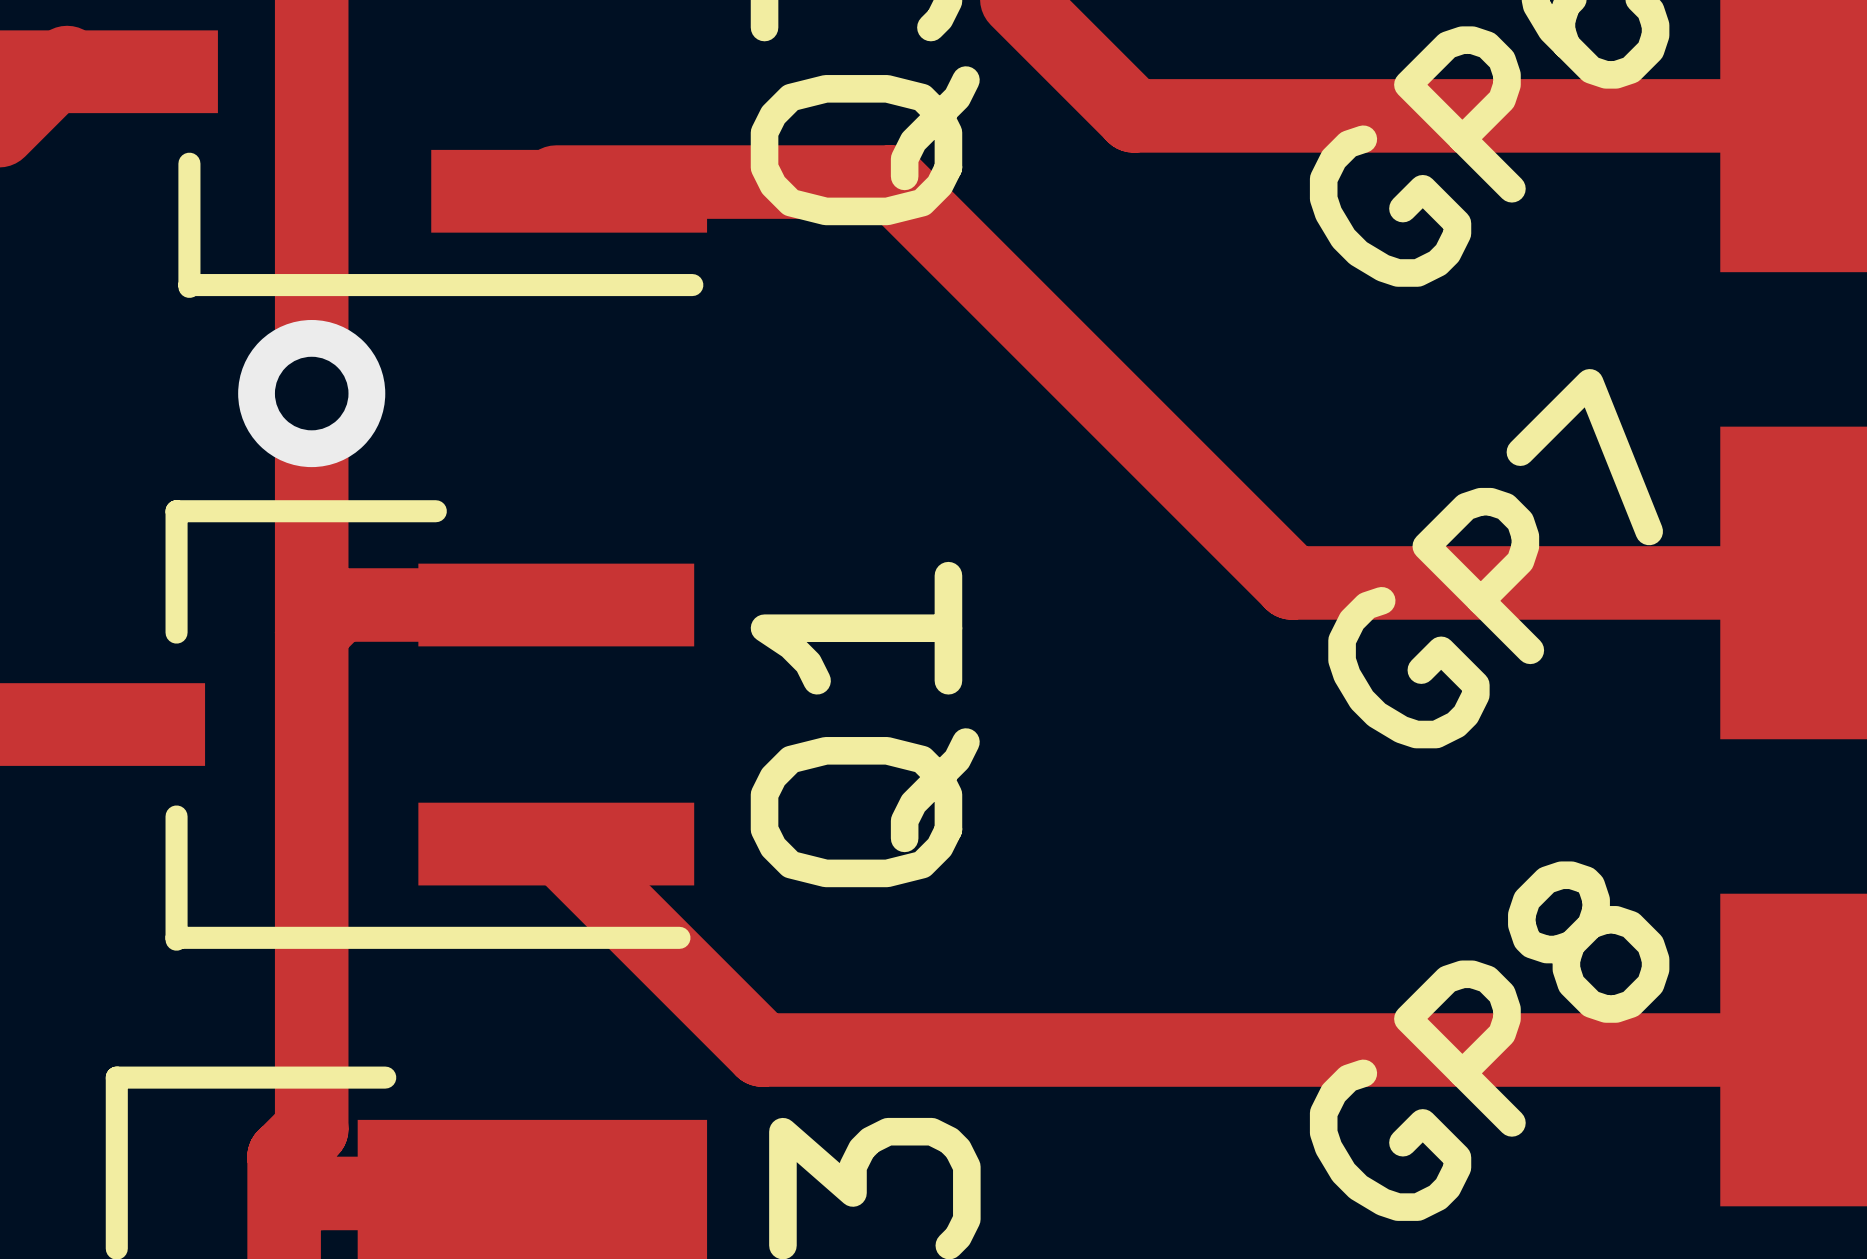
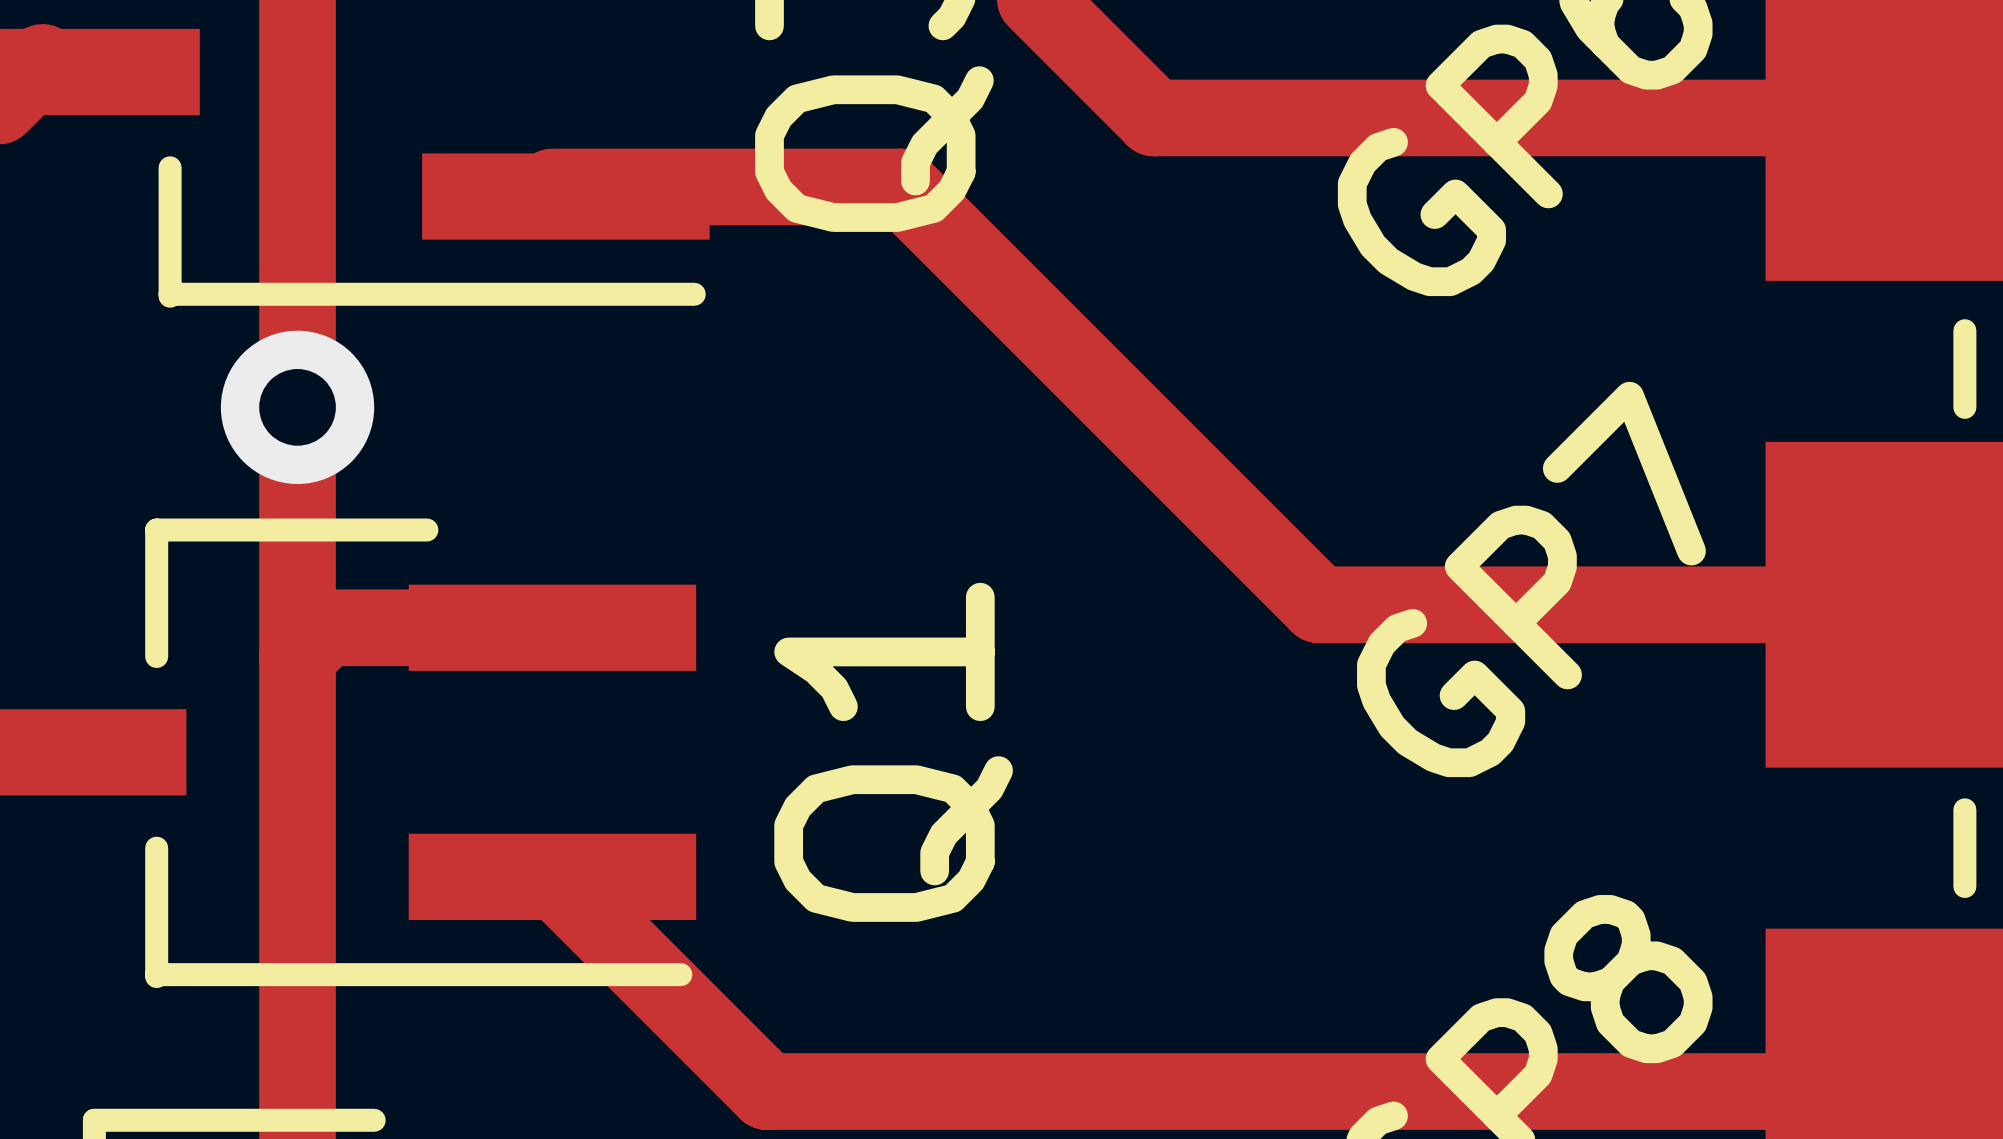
Q1 name position: Q1 (865, 724) -> Q1 (893, 752)

